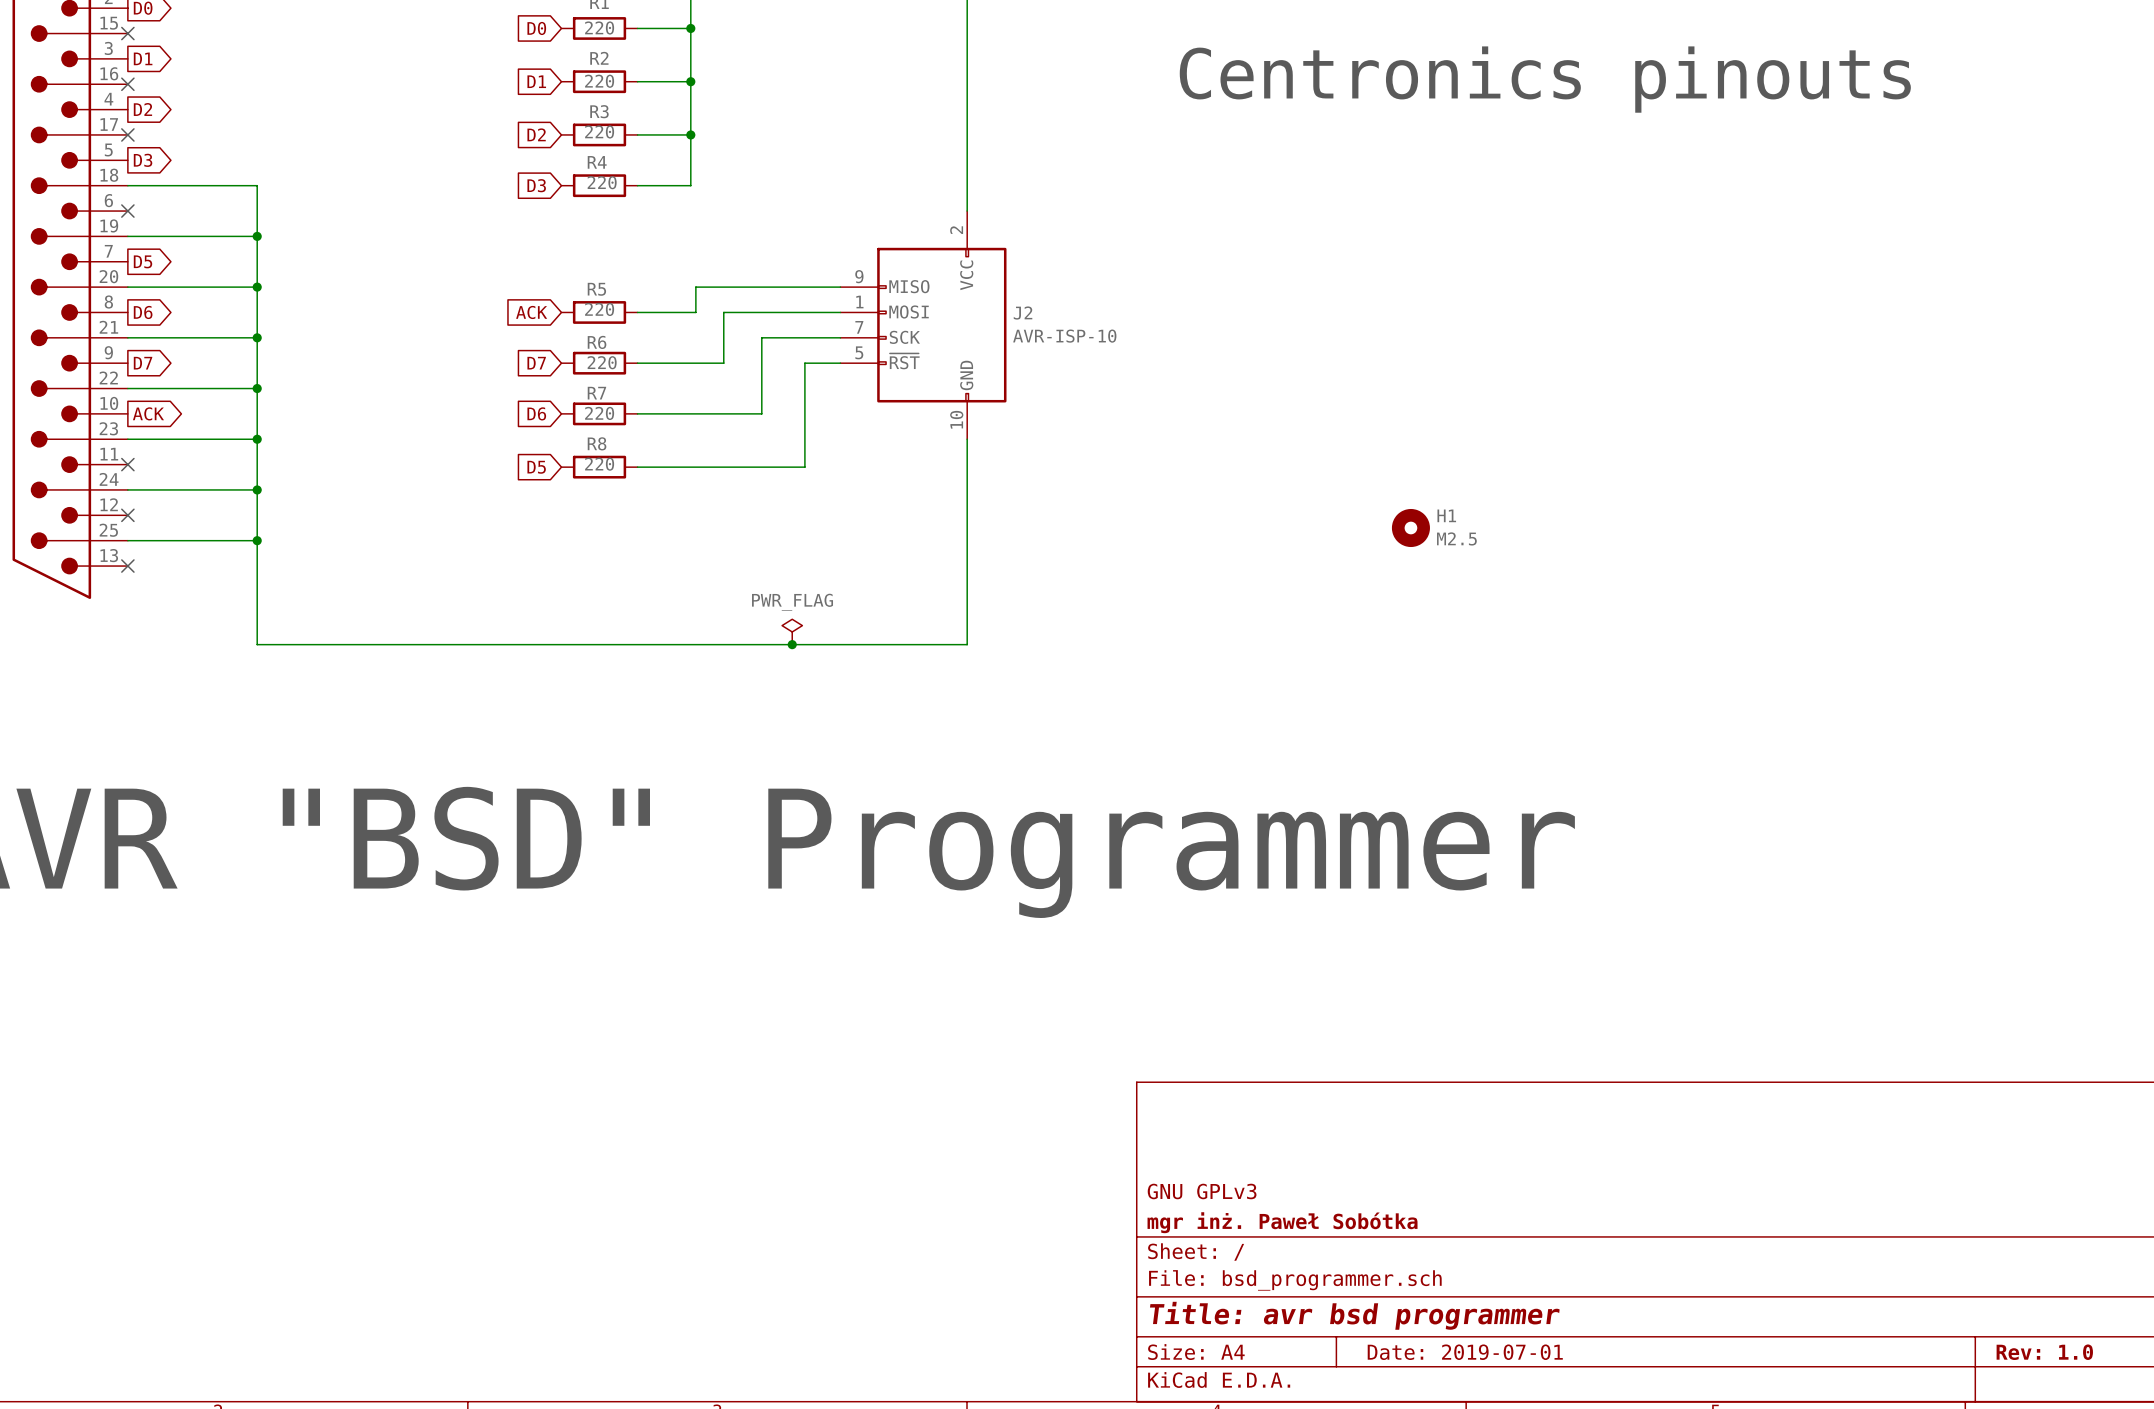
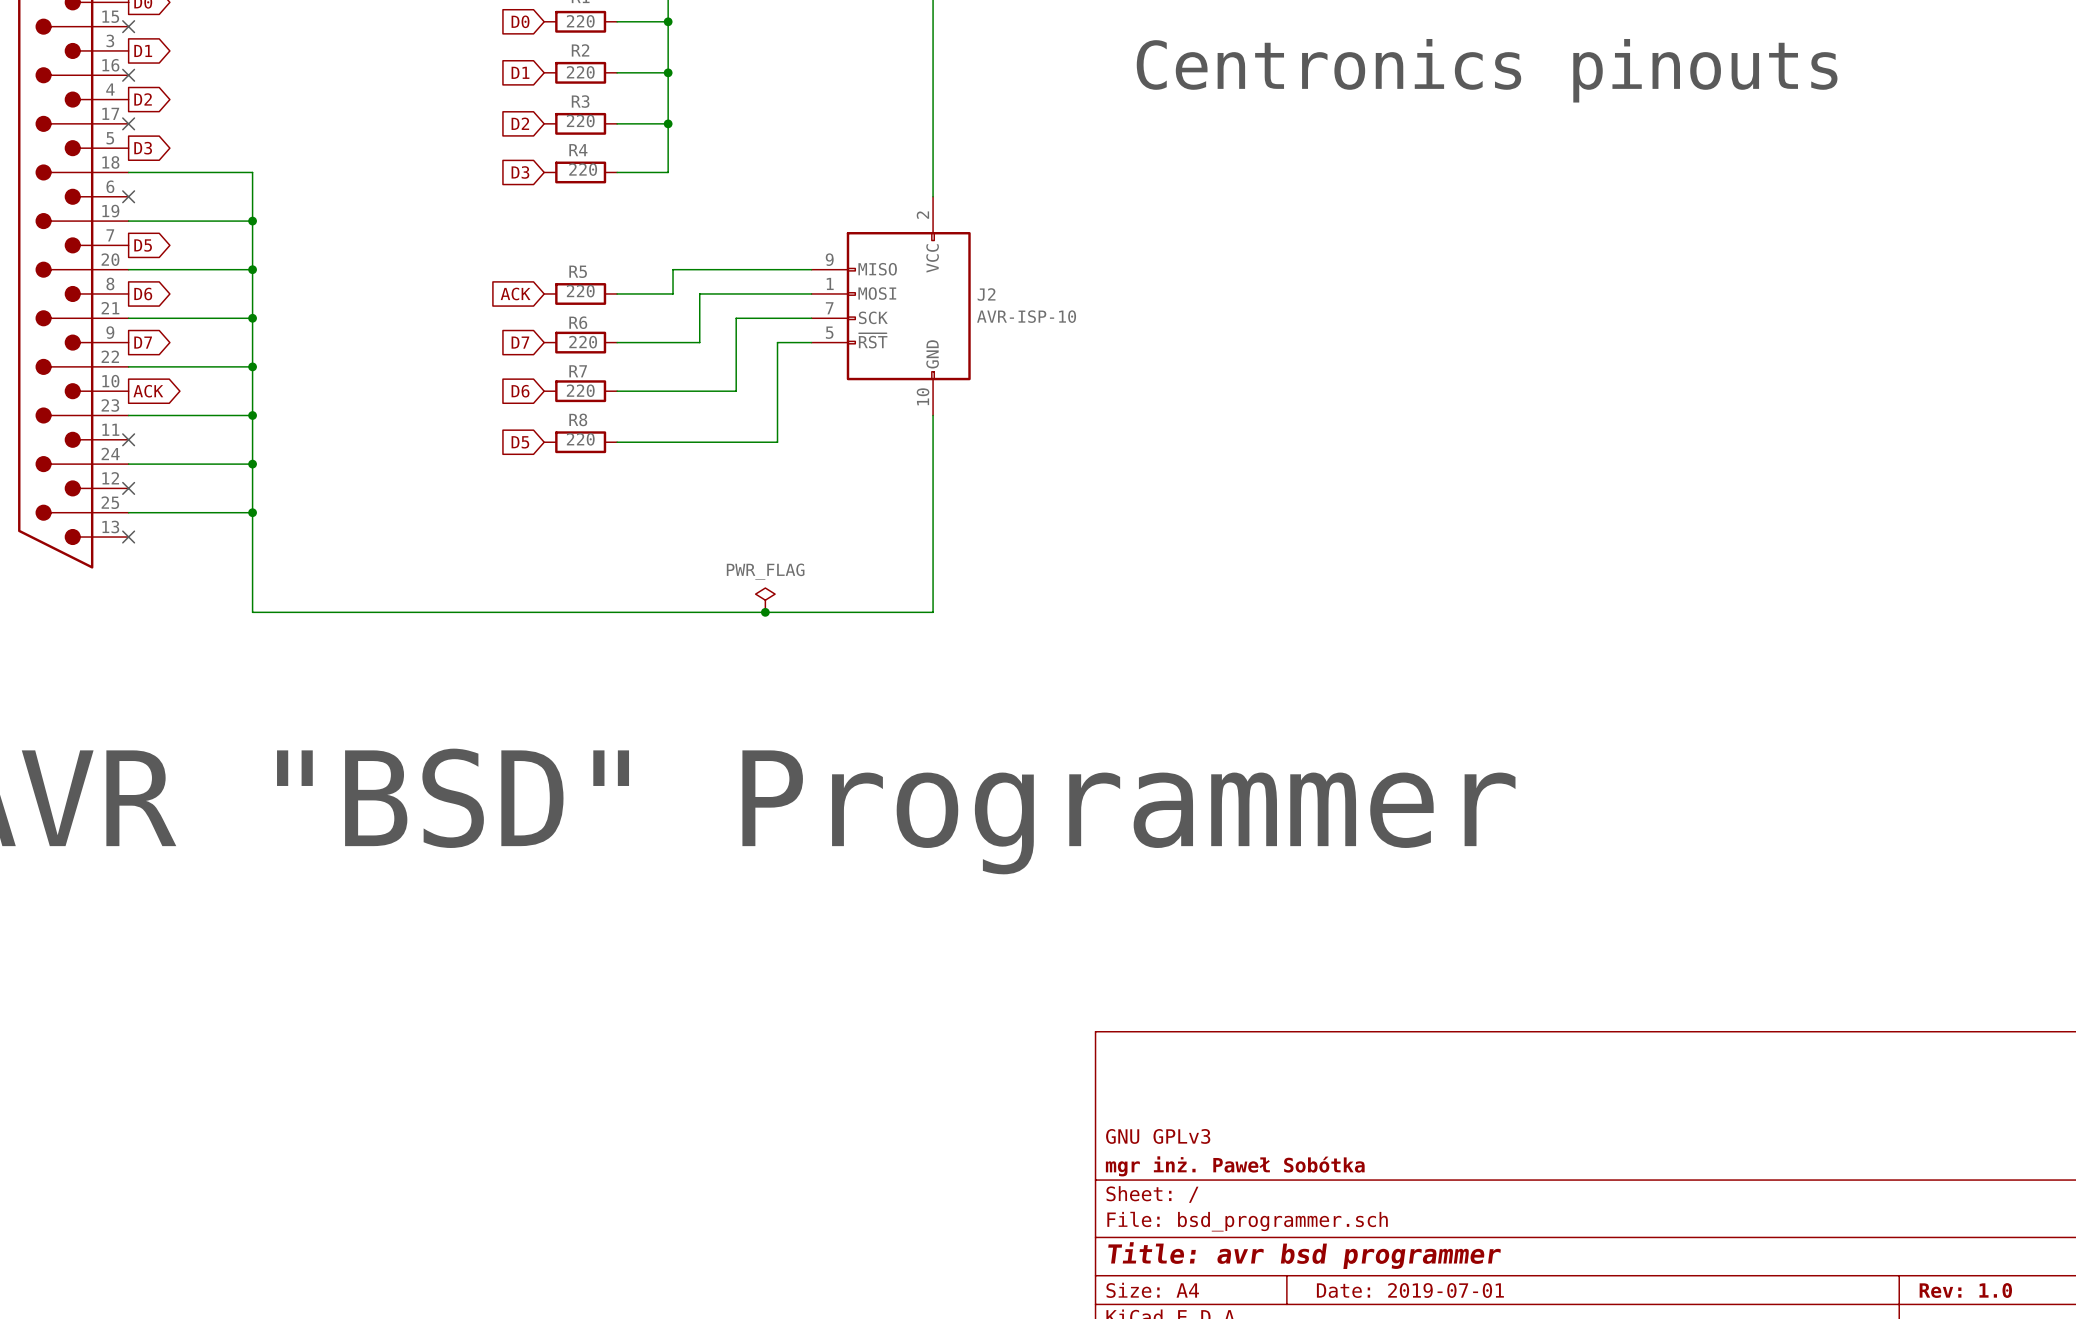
H1: M2.5 (1410, 528) -> none

